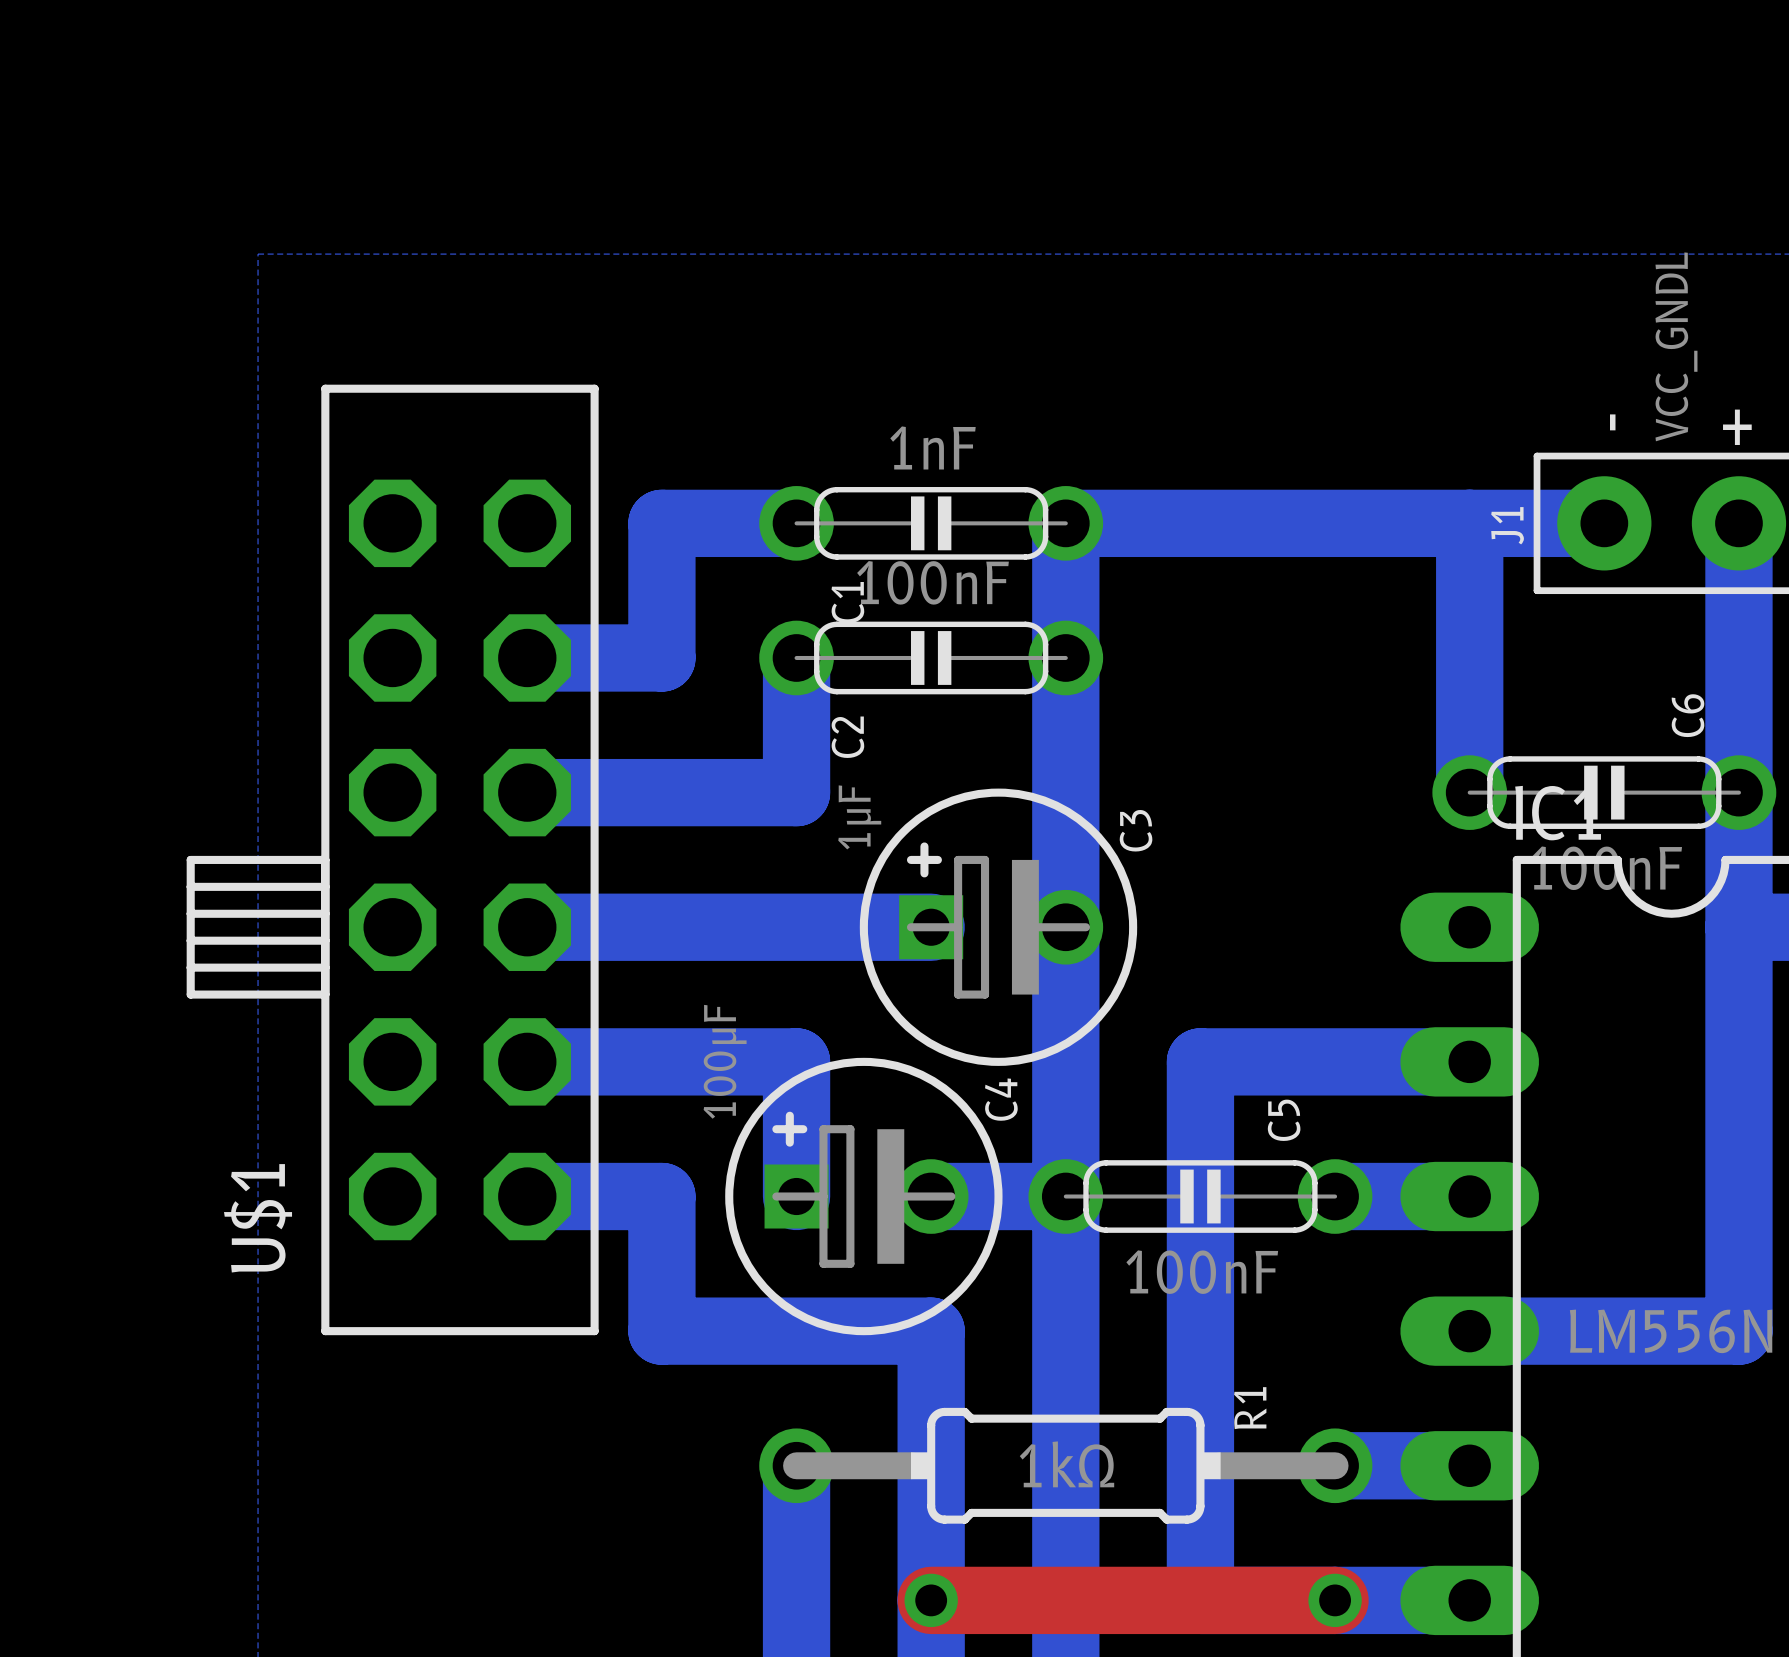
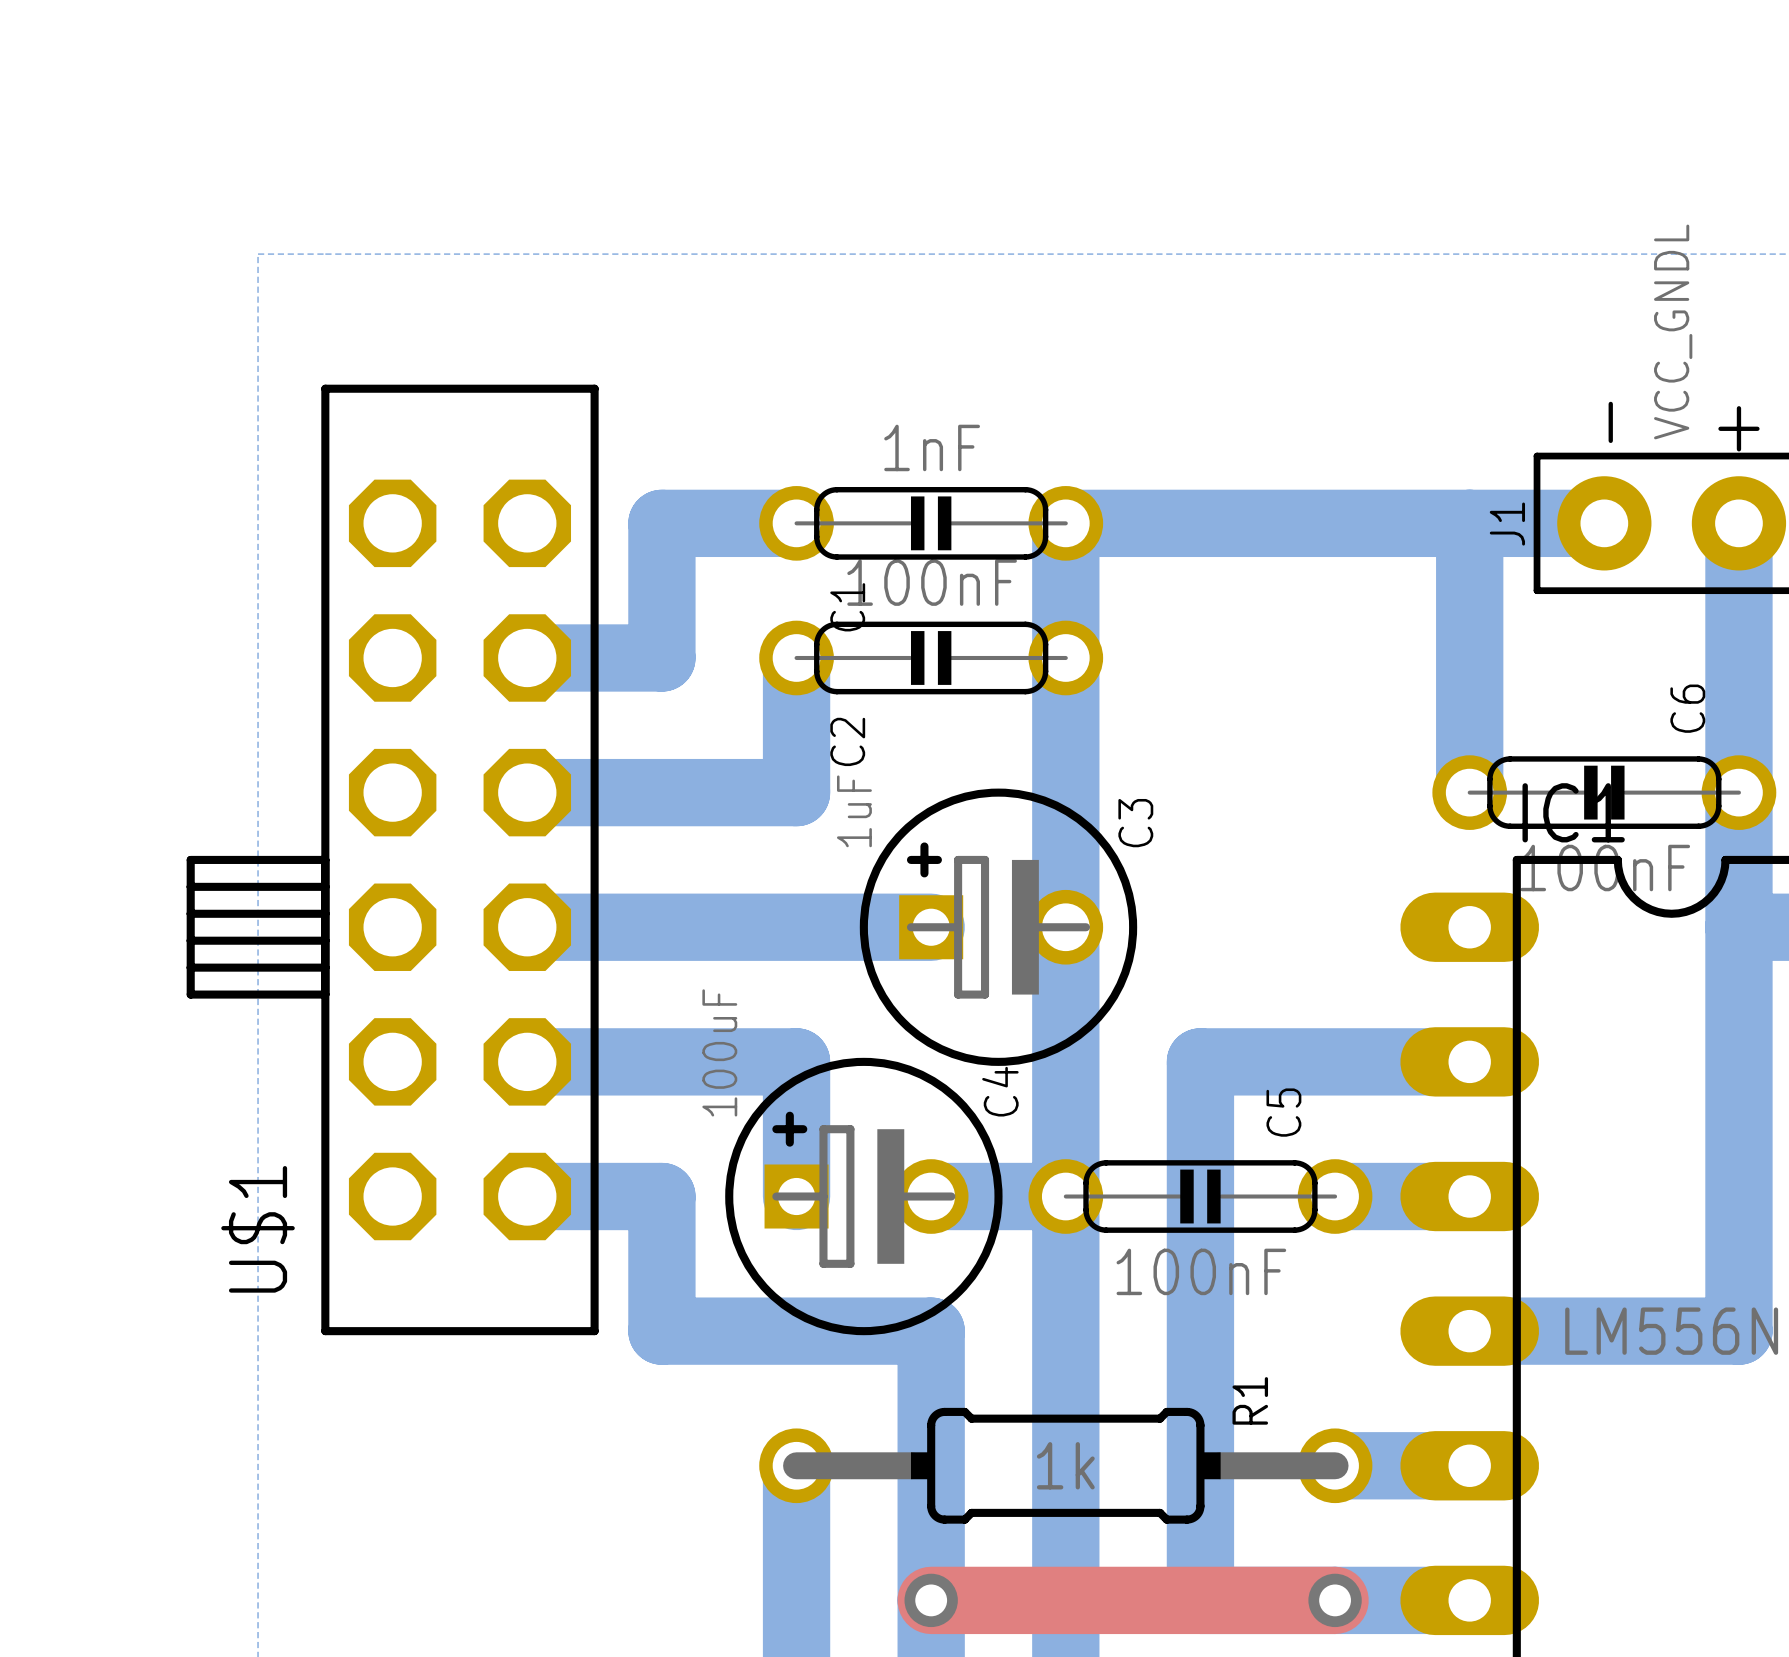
C3 value: 1μF (859, 817) -> 1uF (854, 811)
C4 value: 100μF (725, 1061) -> 100uF (719, 1052)
R1 value: 1kΩ (1067, 1464) -> 1k (1065, 1465)

